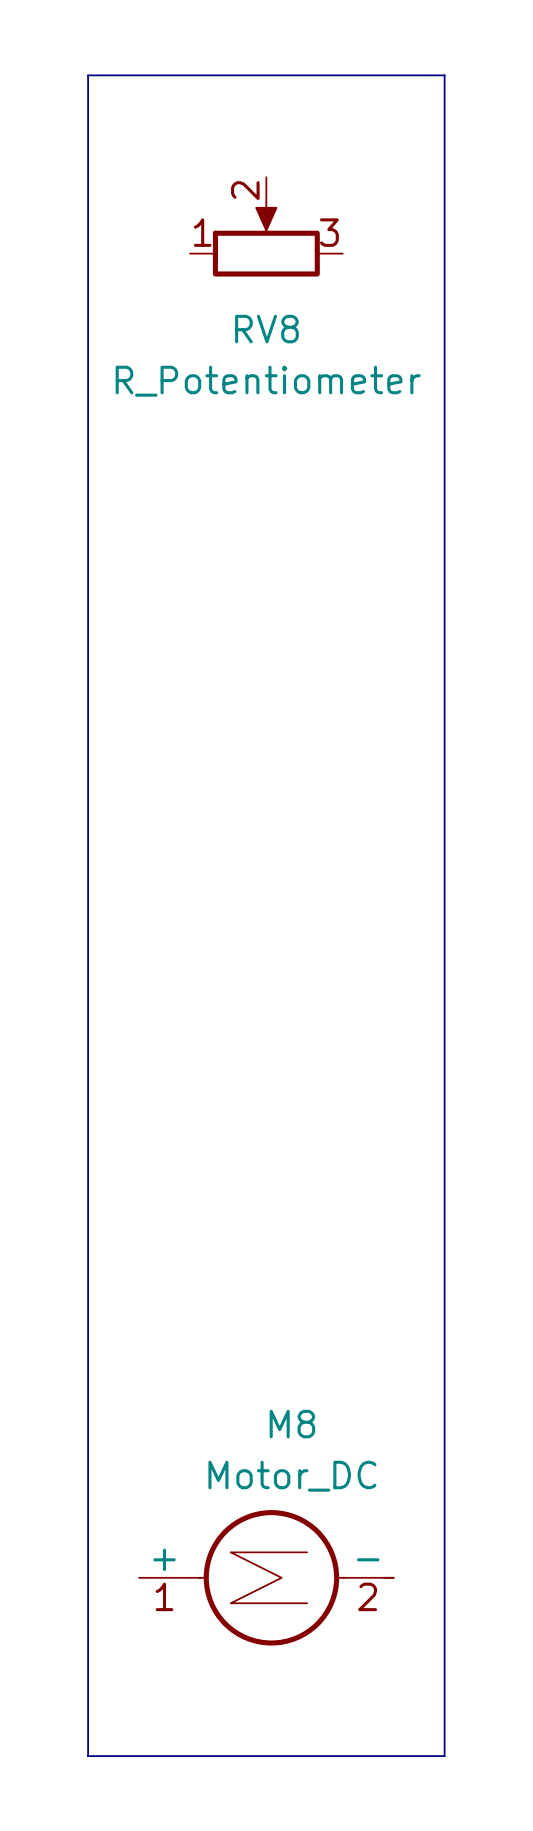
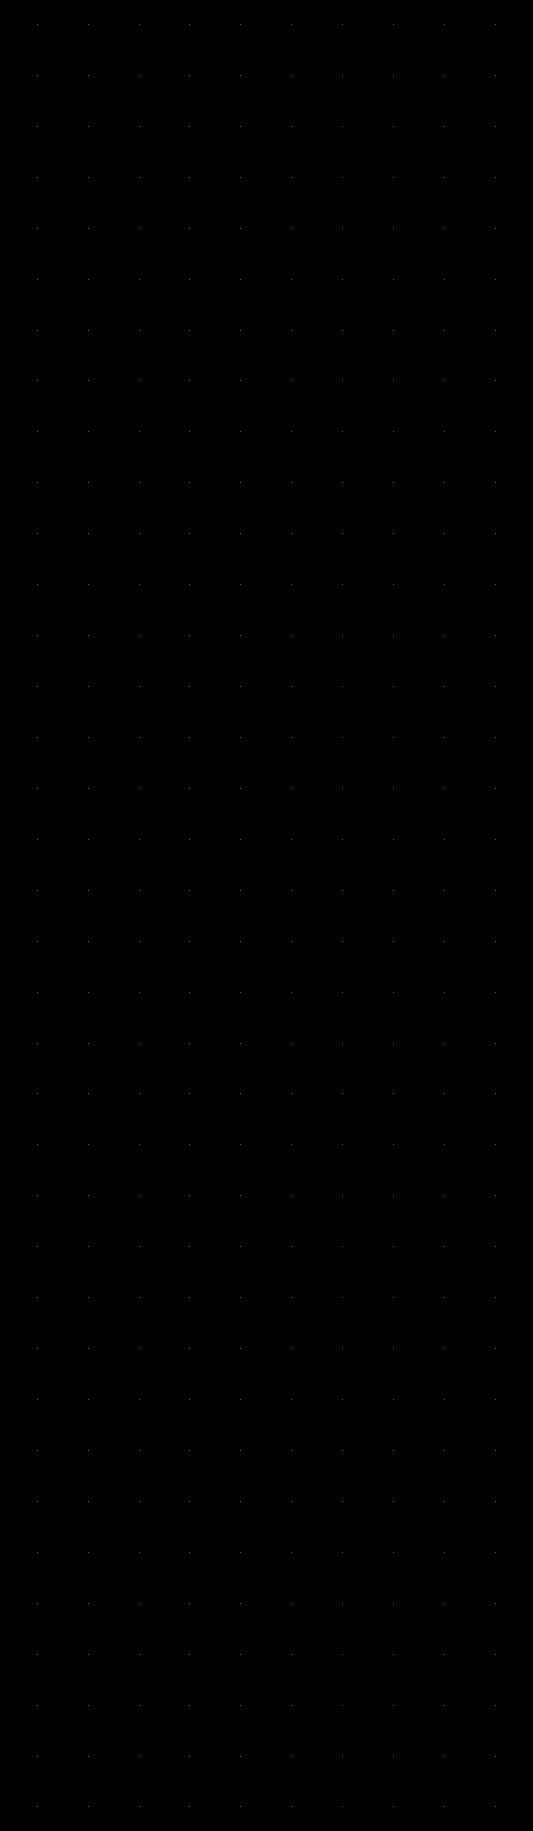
line: (88, 75) (88, 1756) (444, 1756) (444, 75) (88, 75) -> none
RV8: R_Potentiometer (266, 226) -> none
M8: Motor_DC (266, 1577) -> none

